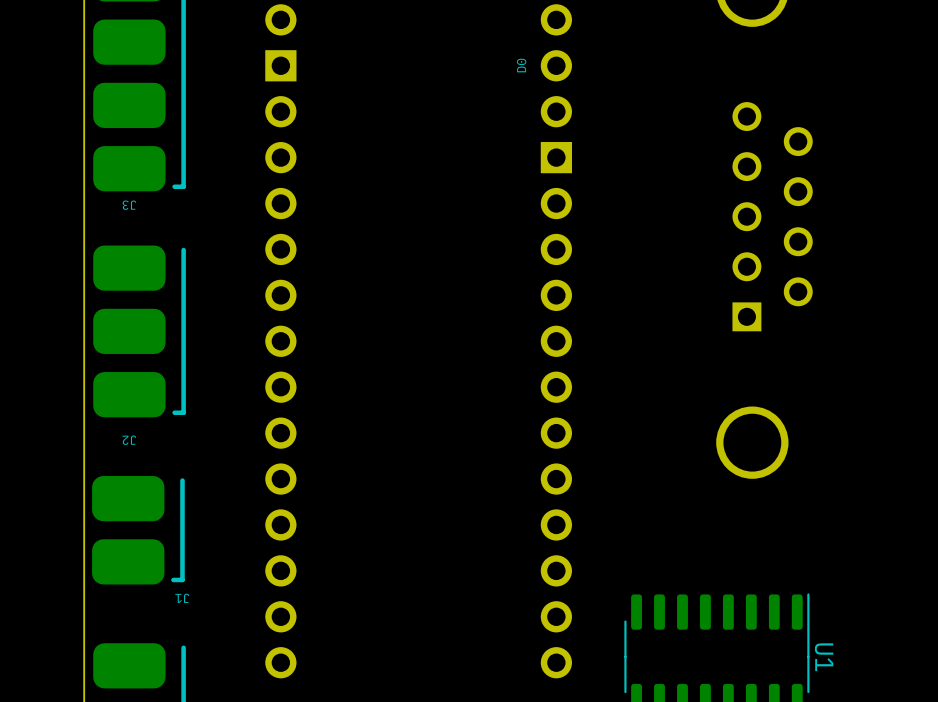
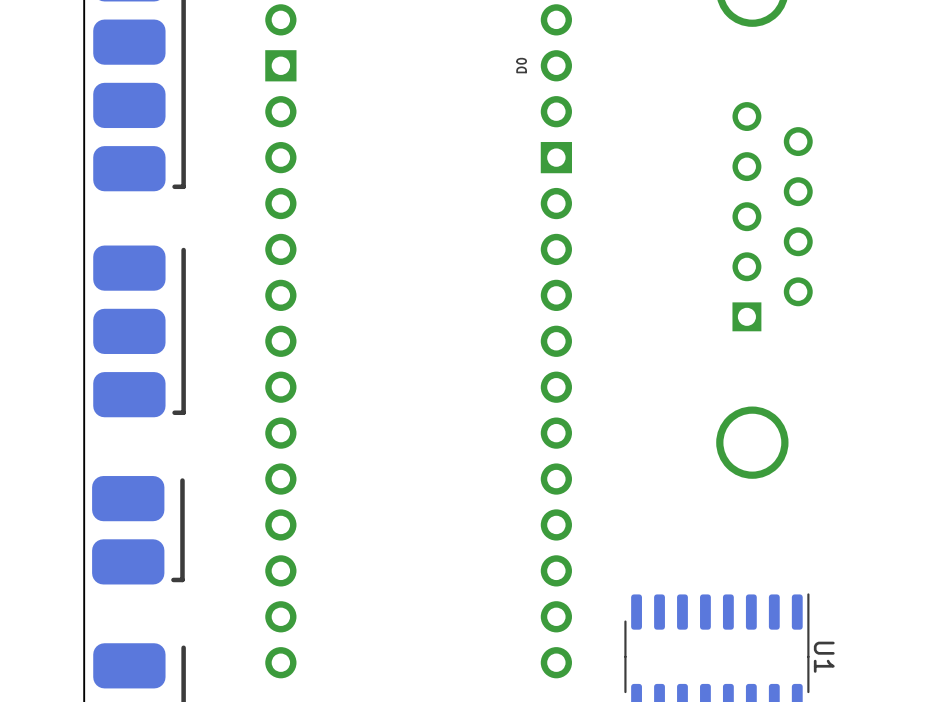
J3 name: J3 (129, 205) -> none
J2 name: J2 (129, 440) -> none
J1 name: J1 (182, 598) -> none

